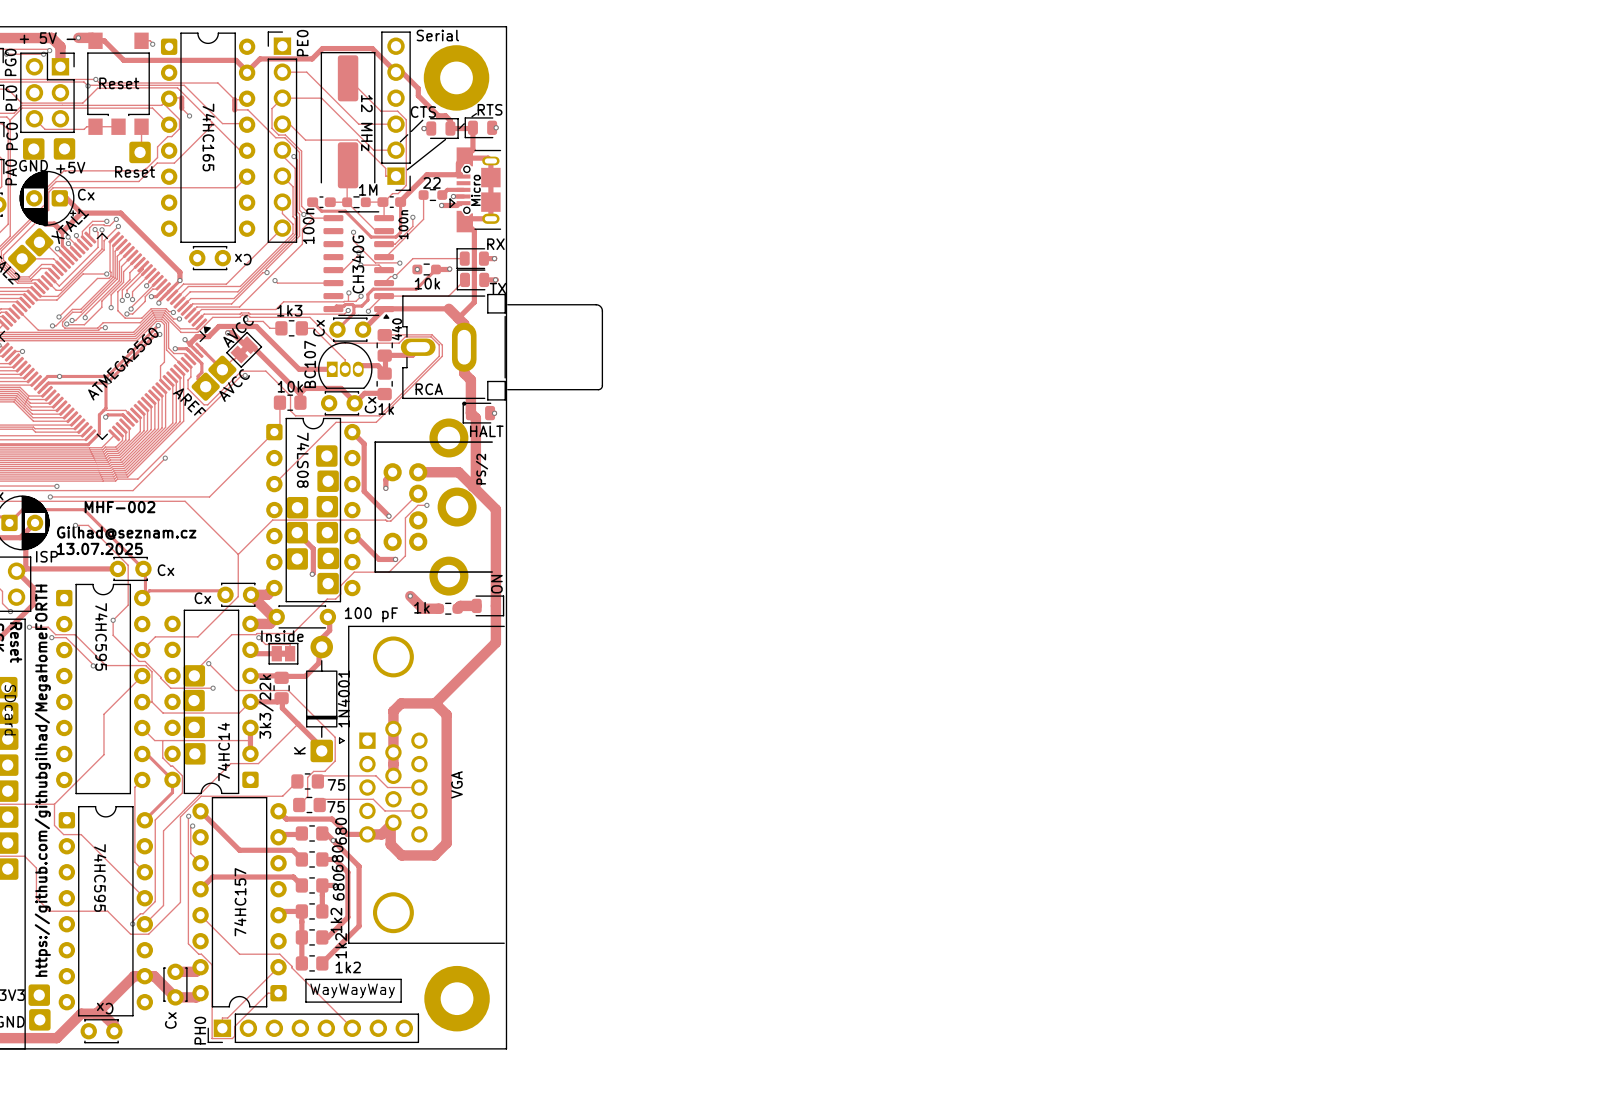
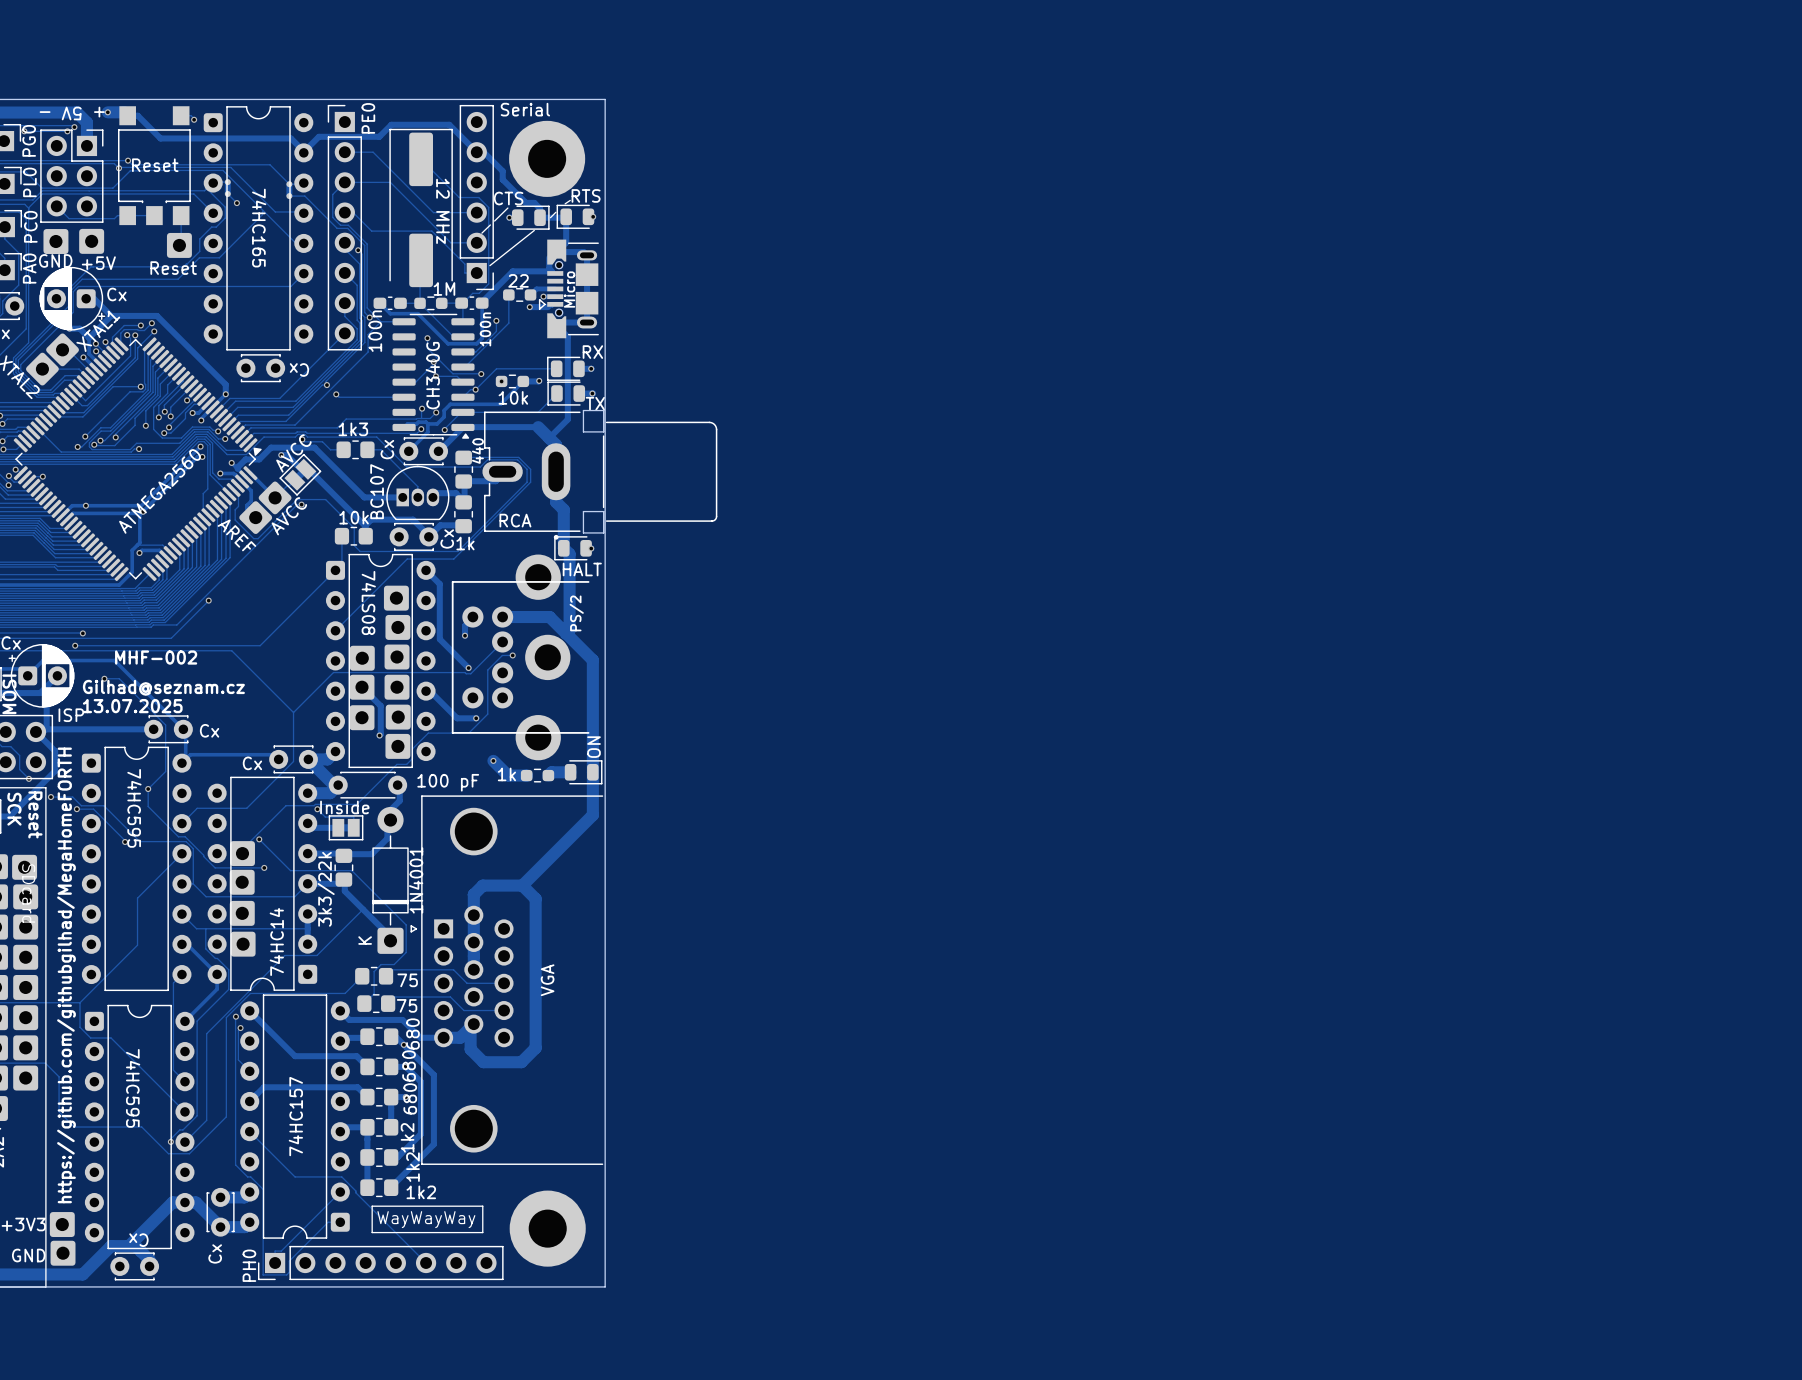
part value rotation: 0° (47, 38) -> 180° (72, 113)

